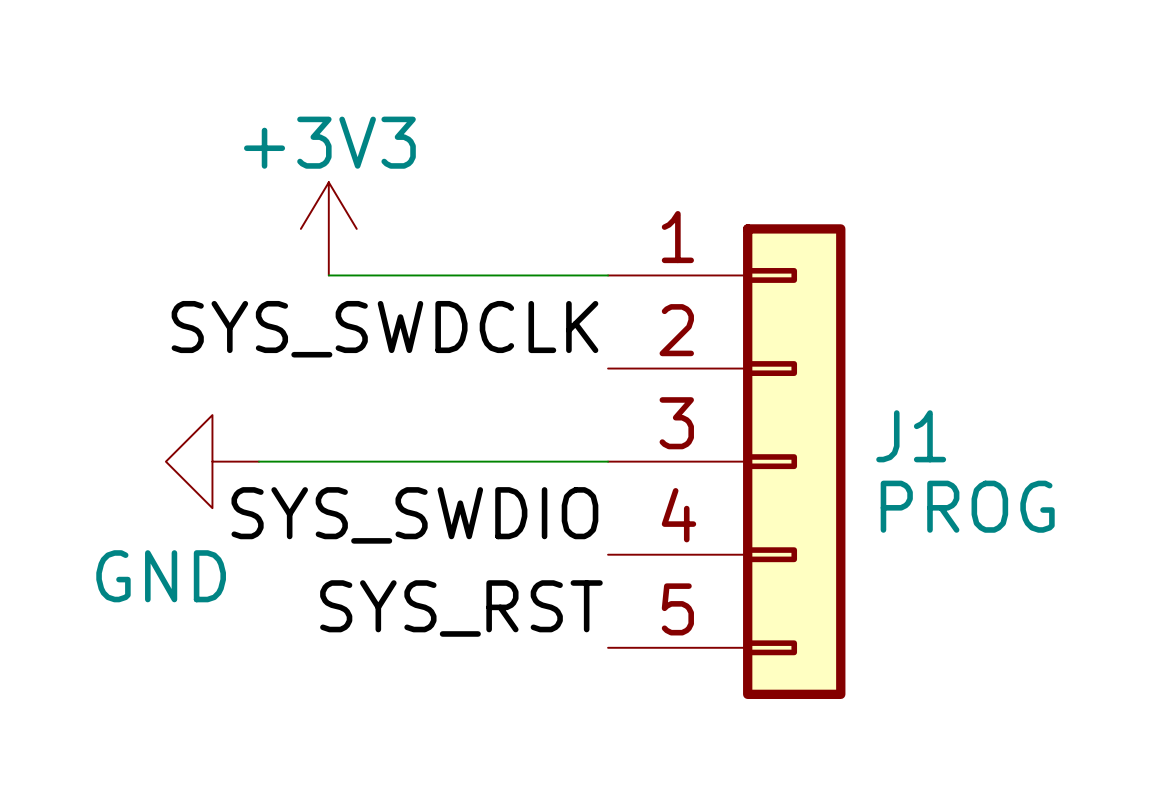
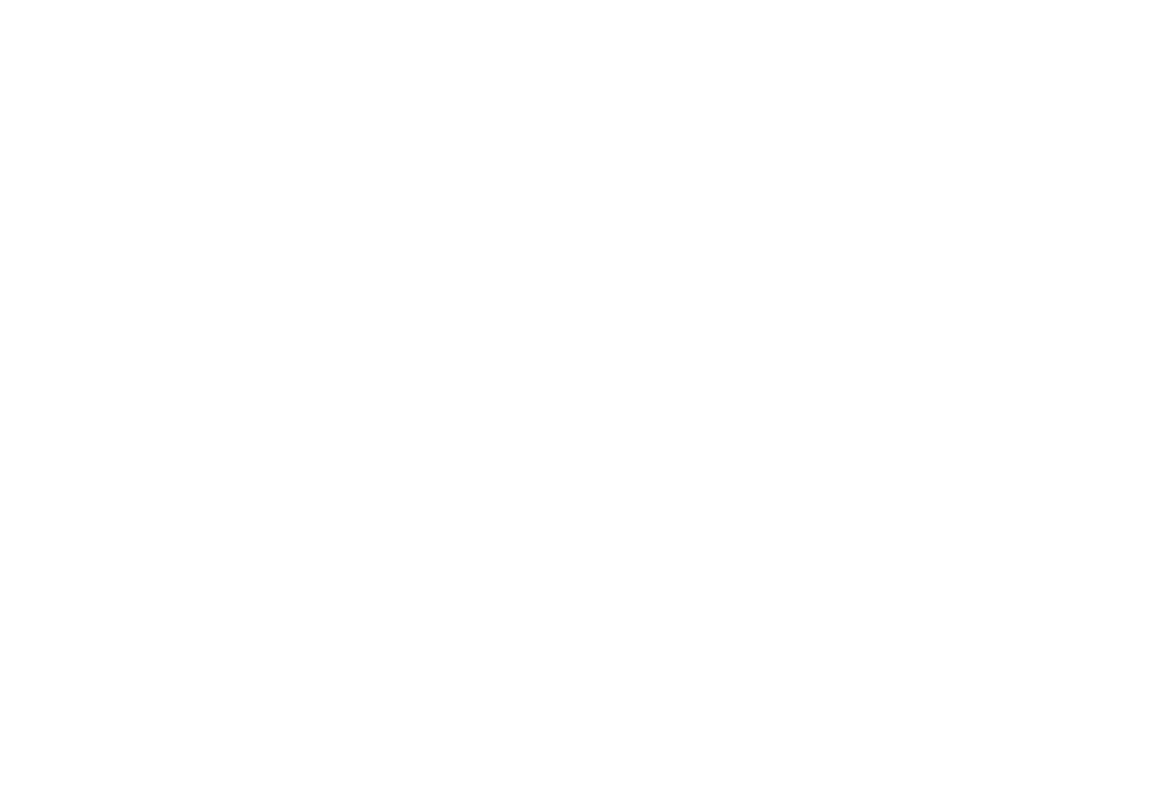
power symbol: +3V3 (328, 228) -> none
wire: (328, 275) (608, 275) -> none
label: SYS_SWDCLK (384, 329) -> none
power symbol: GND (212, 461) -> none
wire: (258, 461) (608, 461) -> none
J1: PROG (726, 461) -> none
label: SYS_SWDIO (414, 515) -> none
label: SYS_RST (461, 608) -> none

